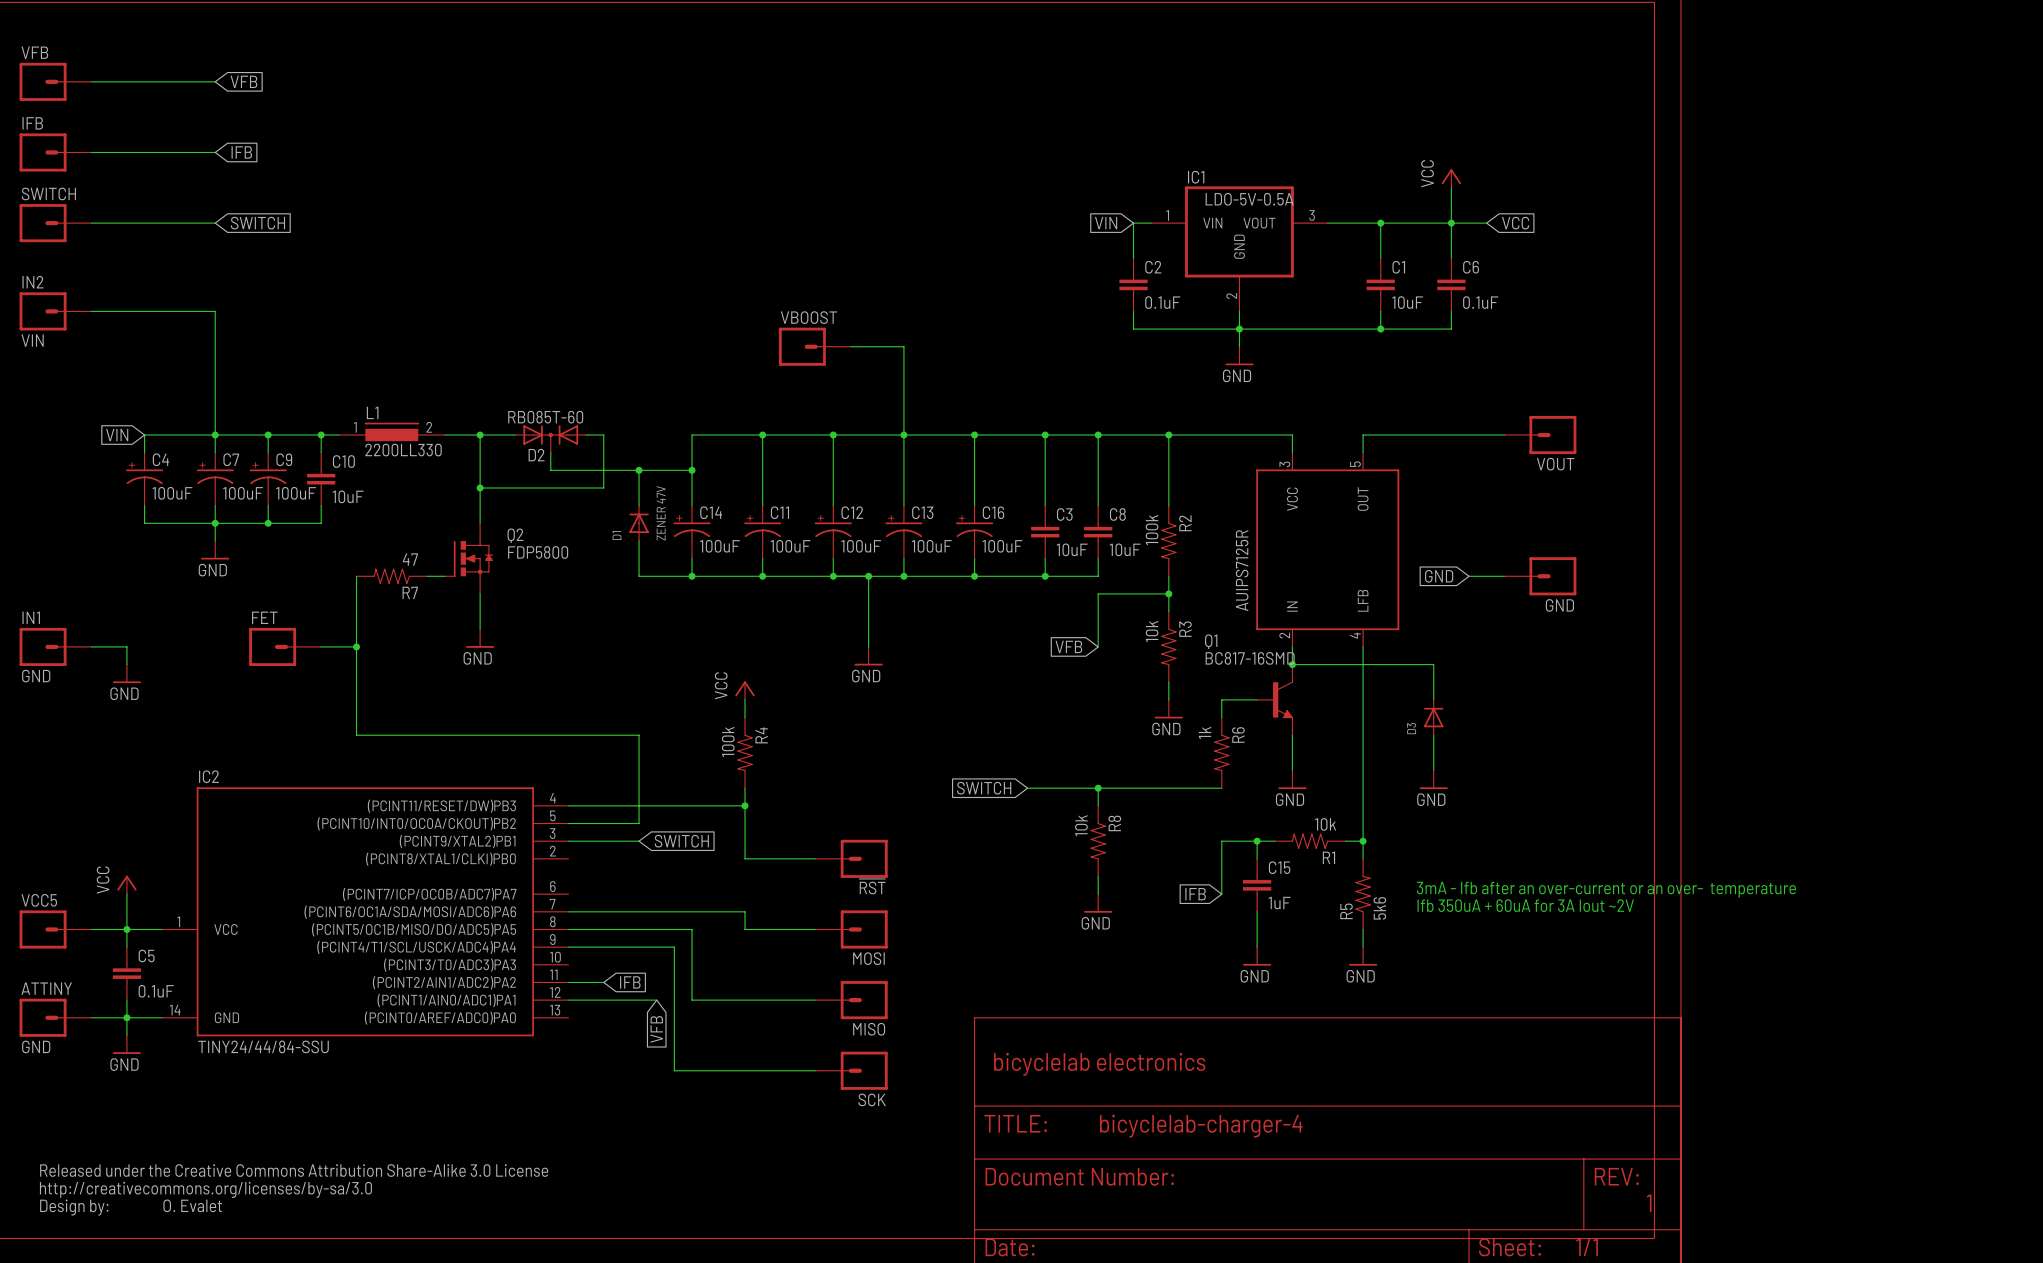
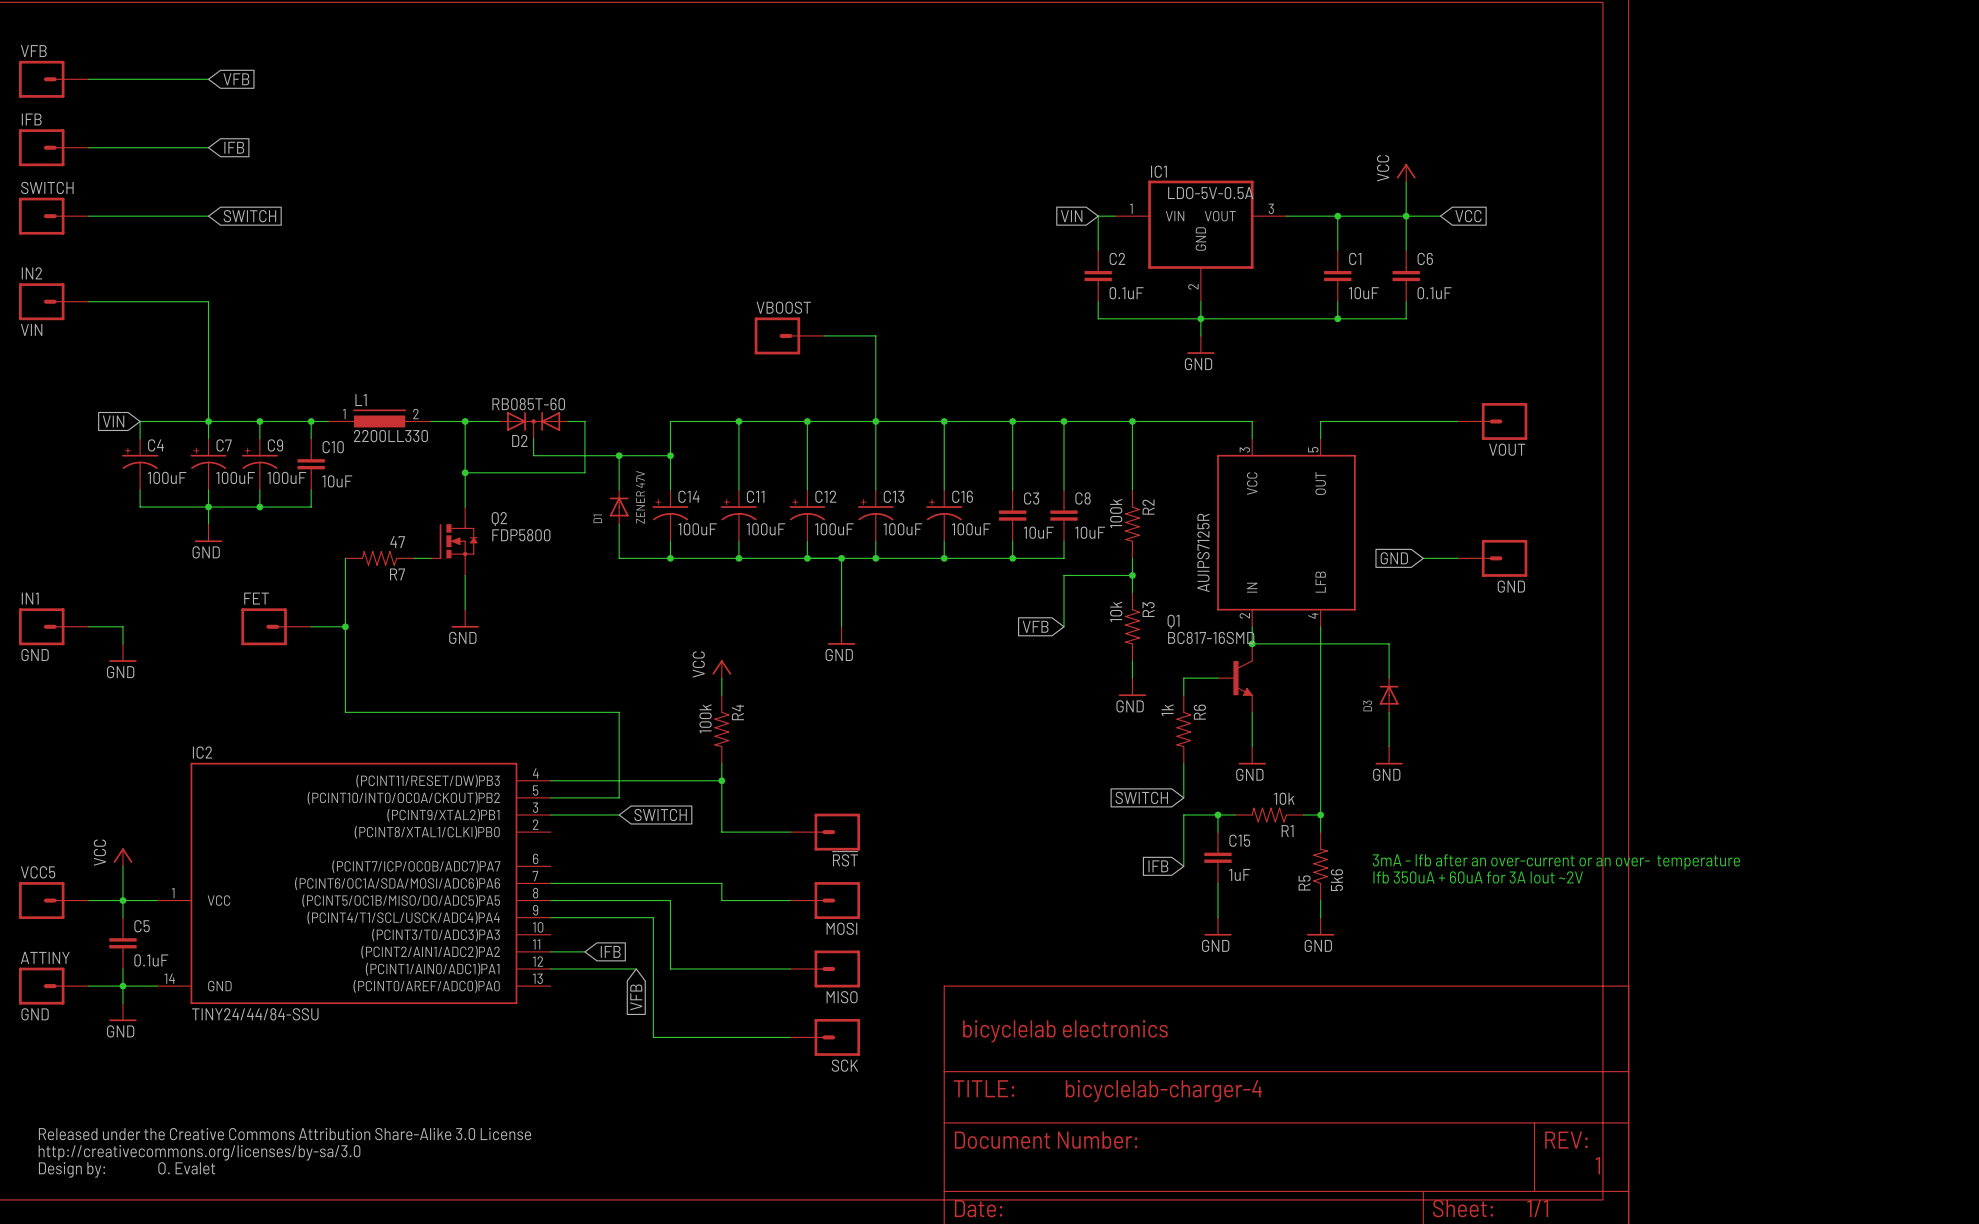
global label: SWITCH (984, 788) -> none
wire: (1027, 788) (1221, 788) -> (1183, 797) (1183, 763)
wire: (1098, 788) (1098, 805) -> none
junction: (1098, 788) -> none
global label: none -> SWITCH (1141, 797)
R8: 10k (1098, 841) -> none
wire: (1098, 876) (1098, 894) -> none
power symbol: GND (1098, 903) -> none

